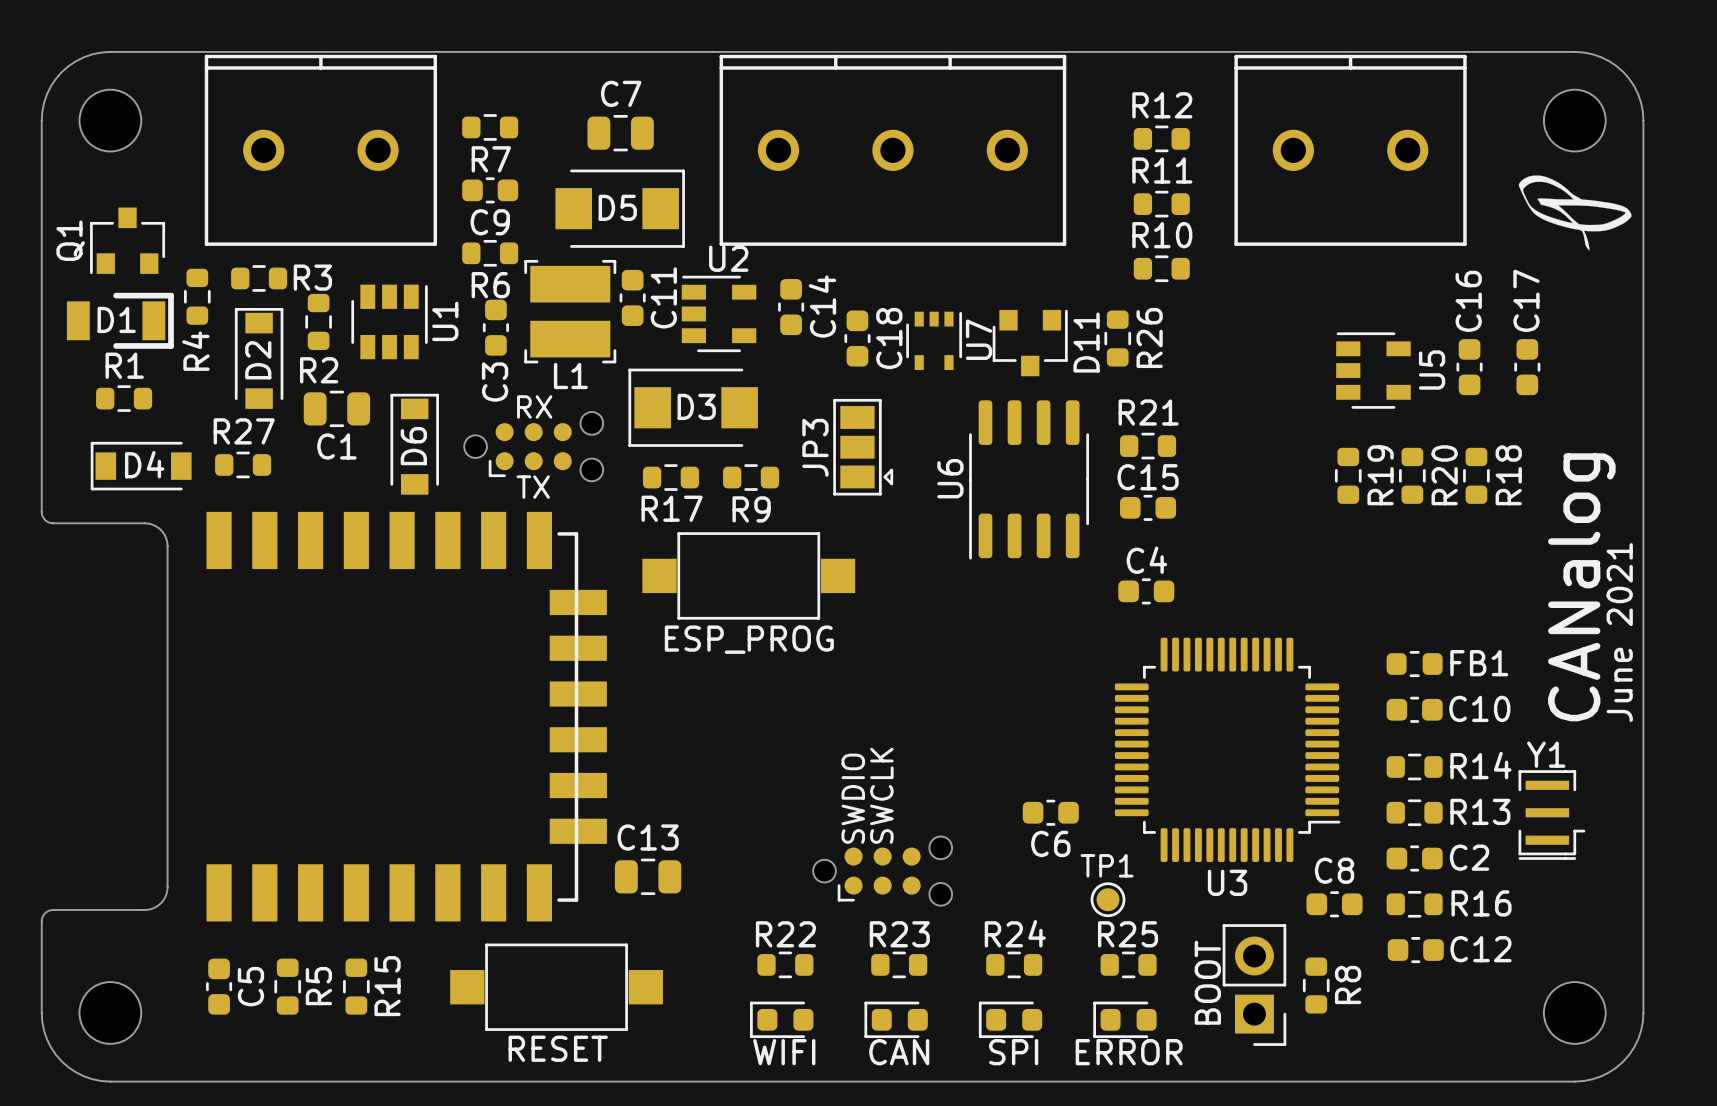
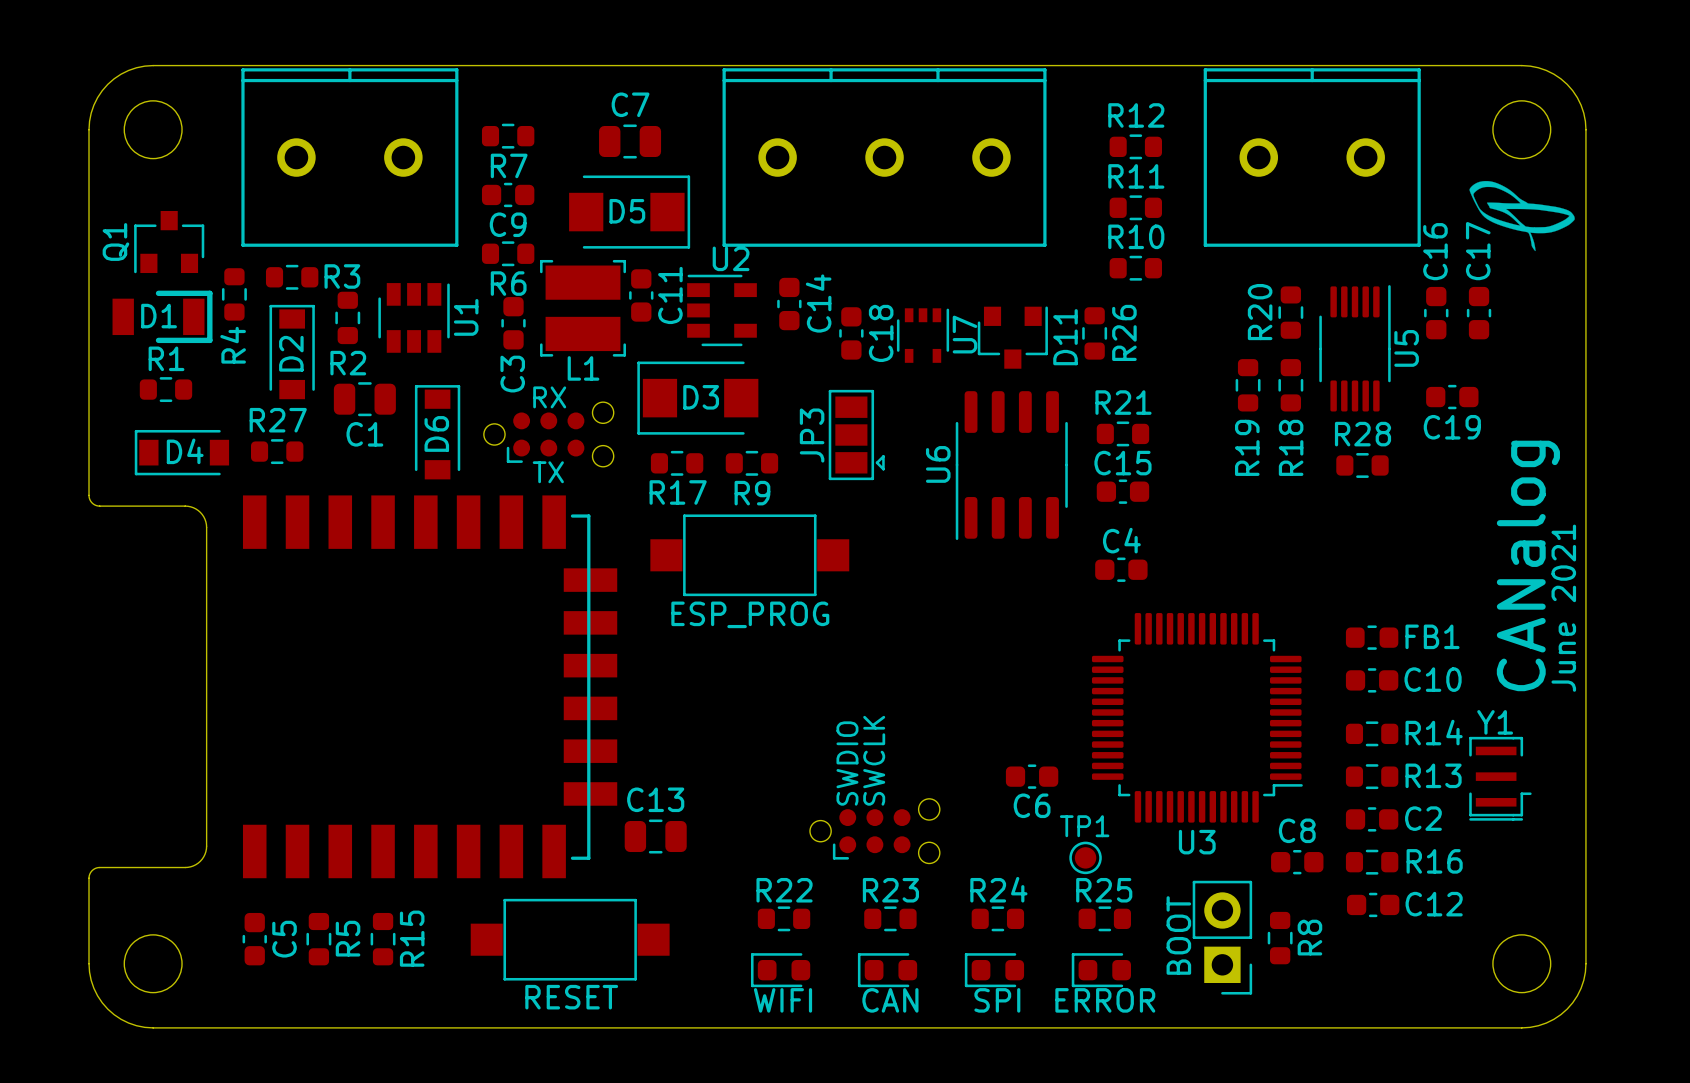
U5 footprint: [1336, 332, 1411, 409] -> [1319, 285, 1391, 412]
C16 position: (1469, 367) -> (1436, 313)
C17 position: (1527, 367) -> (1479, 313)
C19: none -> (1452, 397)
R19 position: (1348, 475) -> (1248, 385)
R19 name position: R19 (1380, 475) -> R19 (1247, 447)
R20 position: (1412, 475) -> (1290, 312)
R20 name position: R20 (1444, 475) -> R20 (1260, 312)
R18 position: (1476, 475) -> (1290, 385)
R18 name position: R18 (1508, 475) -> R18 (1291, 447)
R28: none -> (1362, 465)

